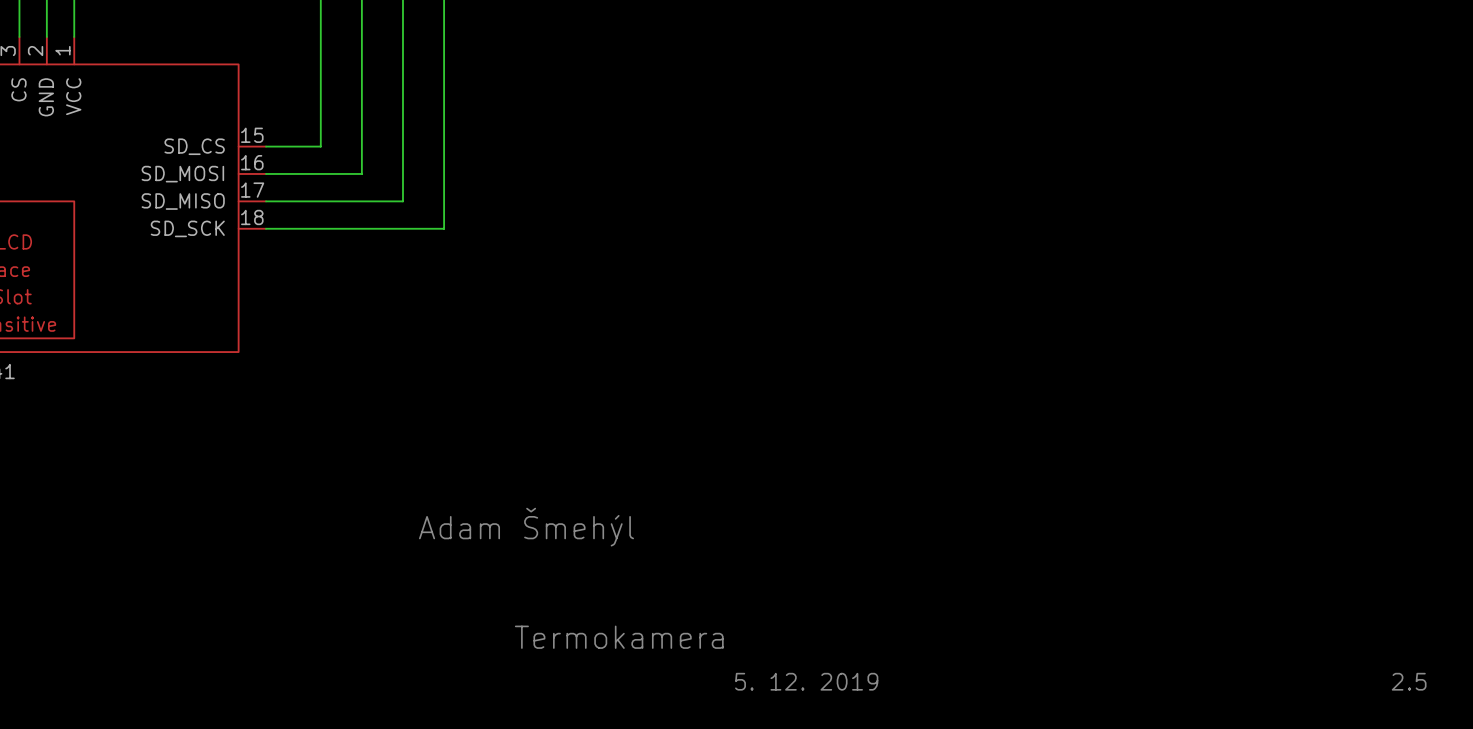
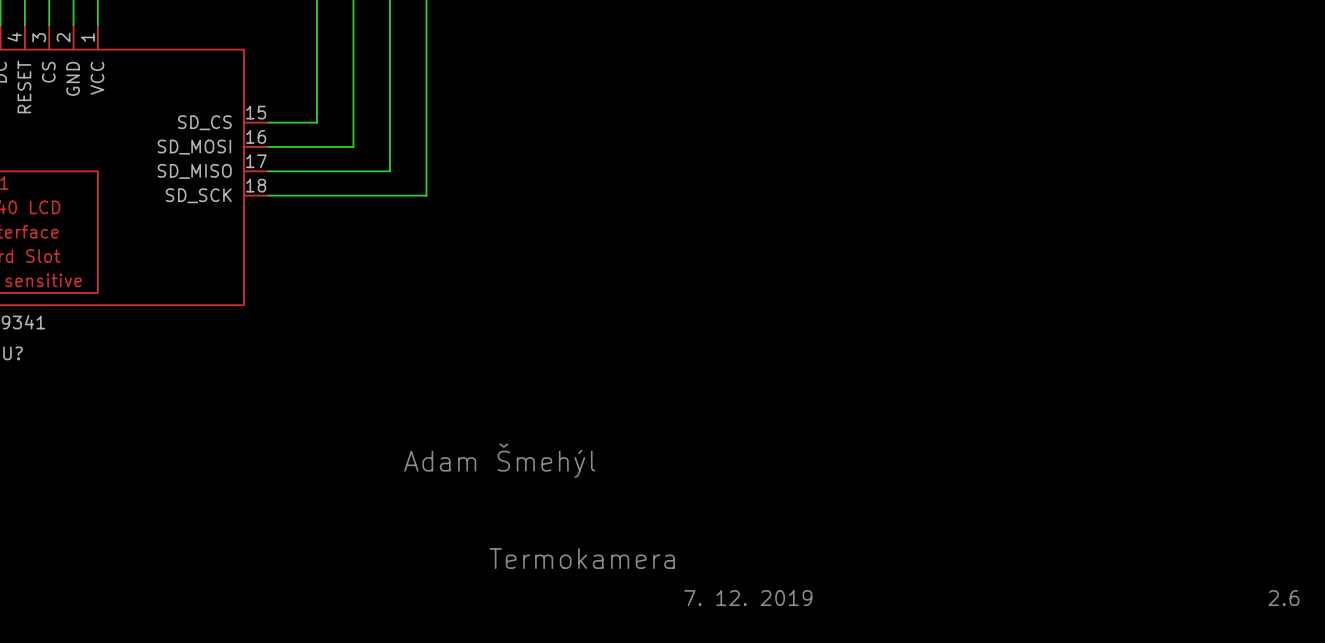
text: 5. 12. 2019 (806, 681) -> 7. 12. 2019 (748, 598)
text: 2.5 (1409, 681) -> 2.6 (1283, 598)

